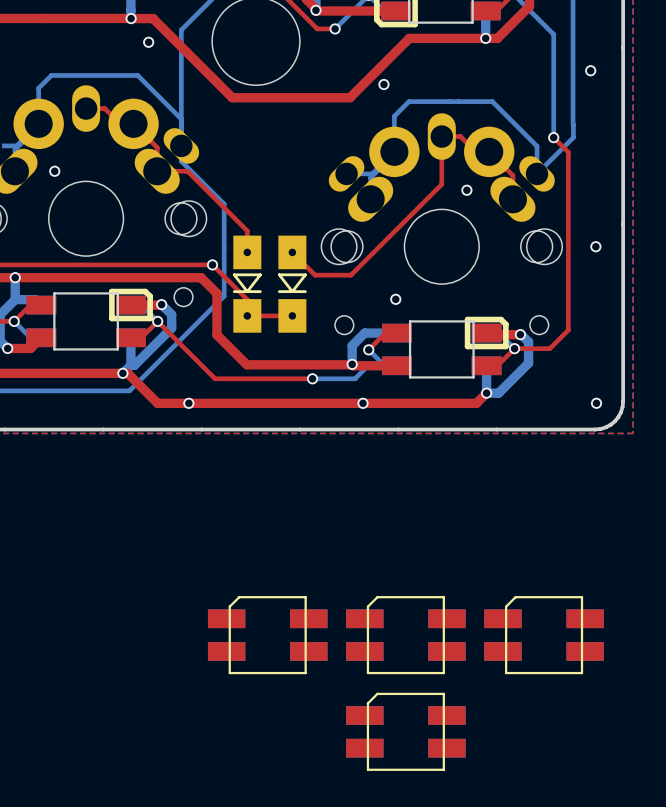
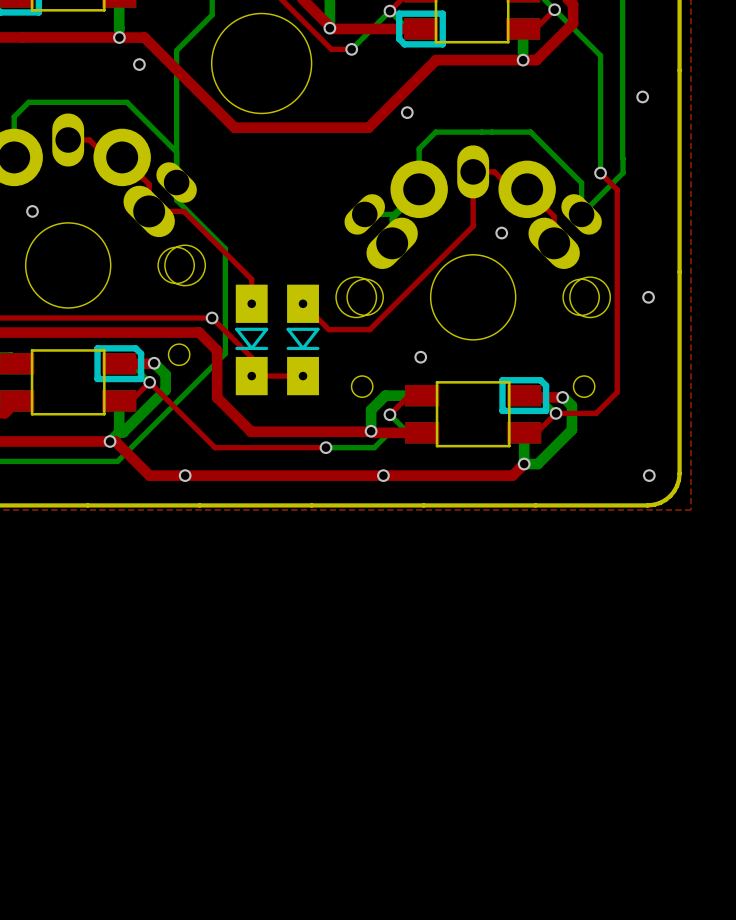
part: (267, 635) -> none
part: (405, 635) -> none
part: (544, 635) -> none
part: (405, 731) -> none

